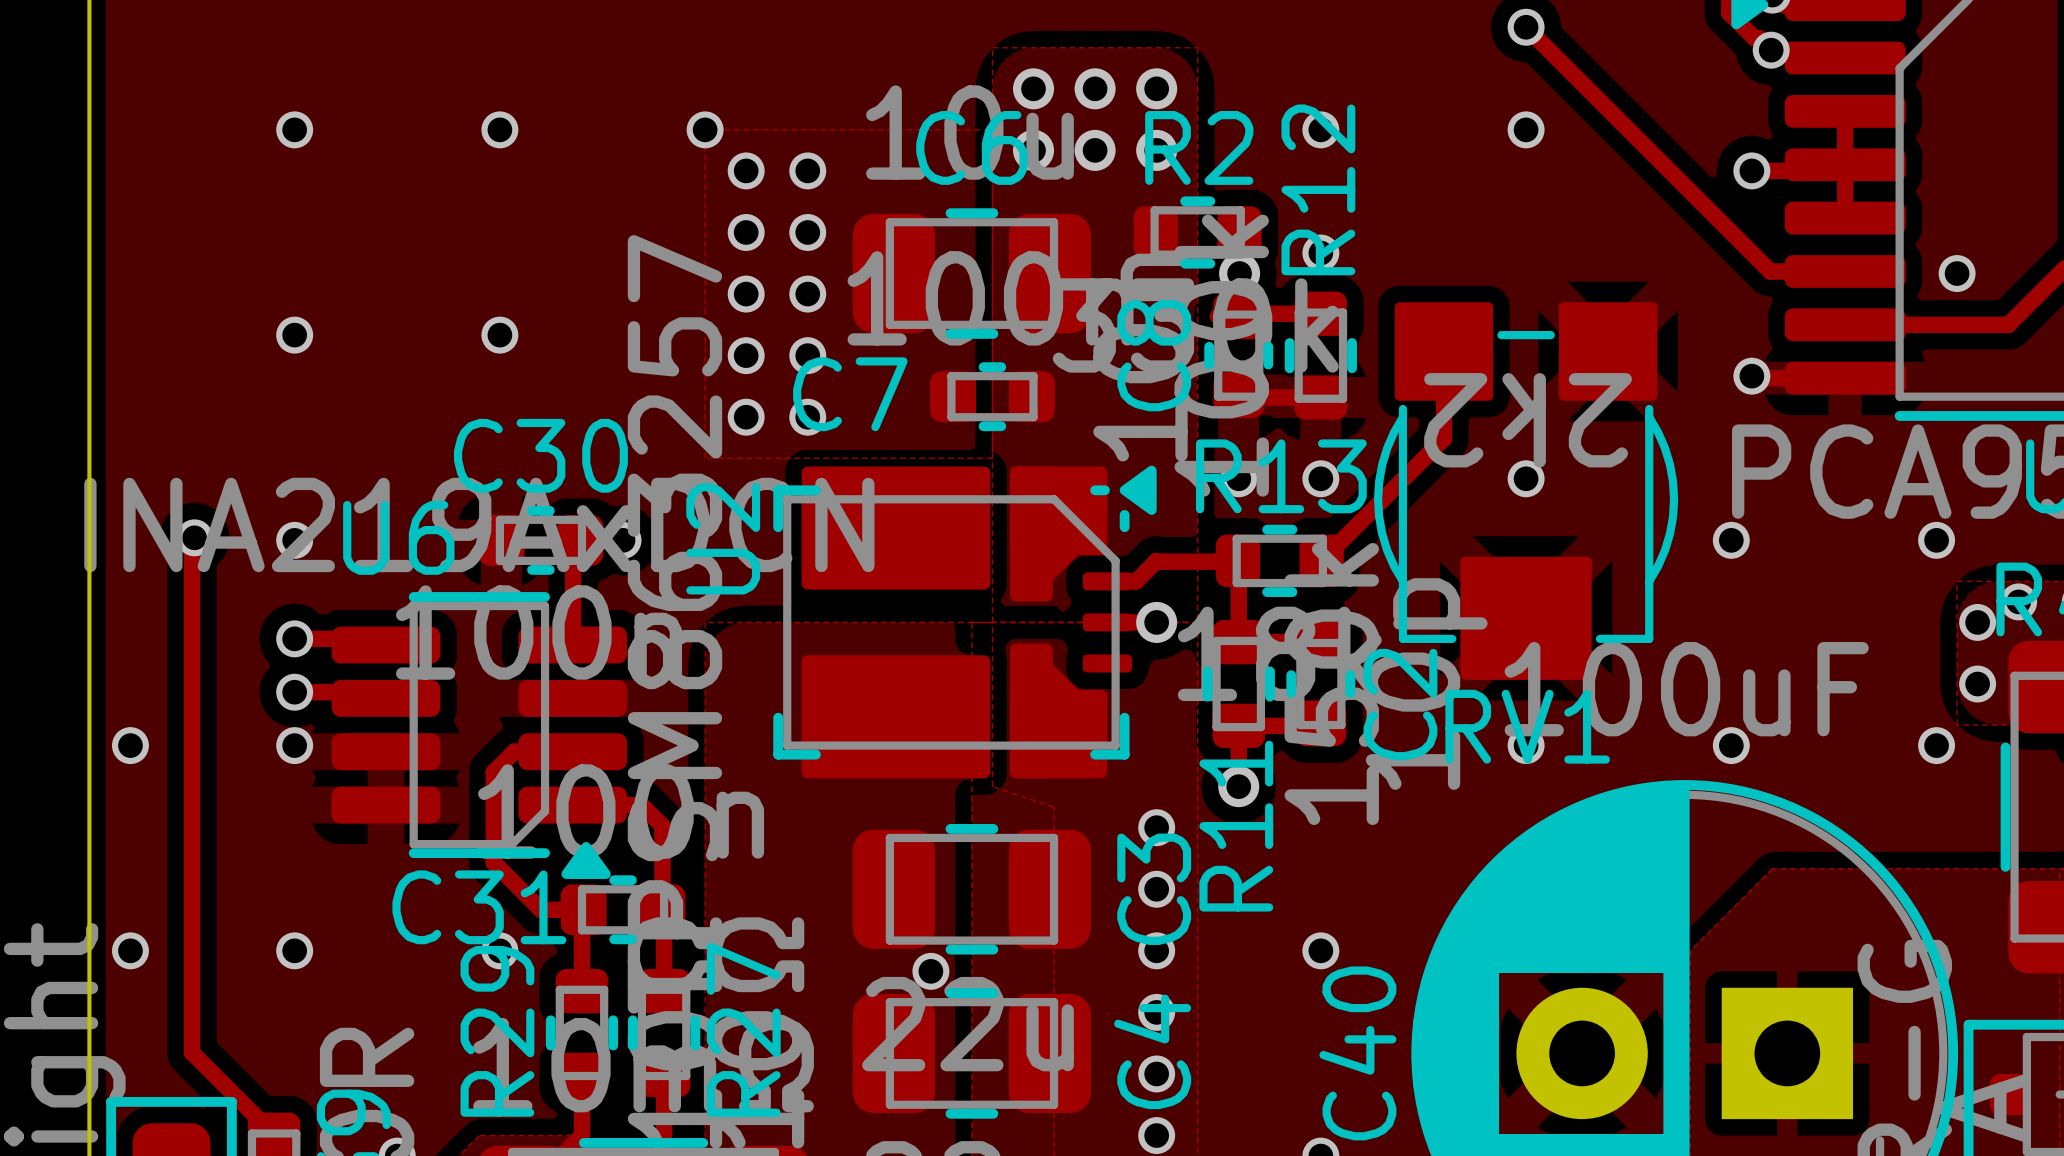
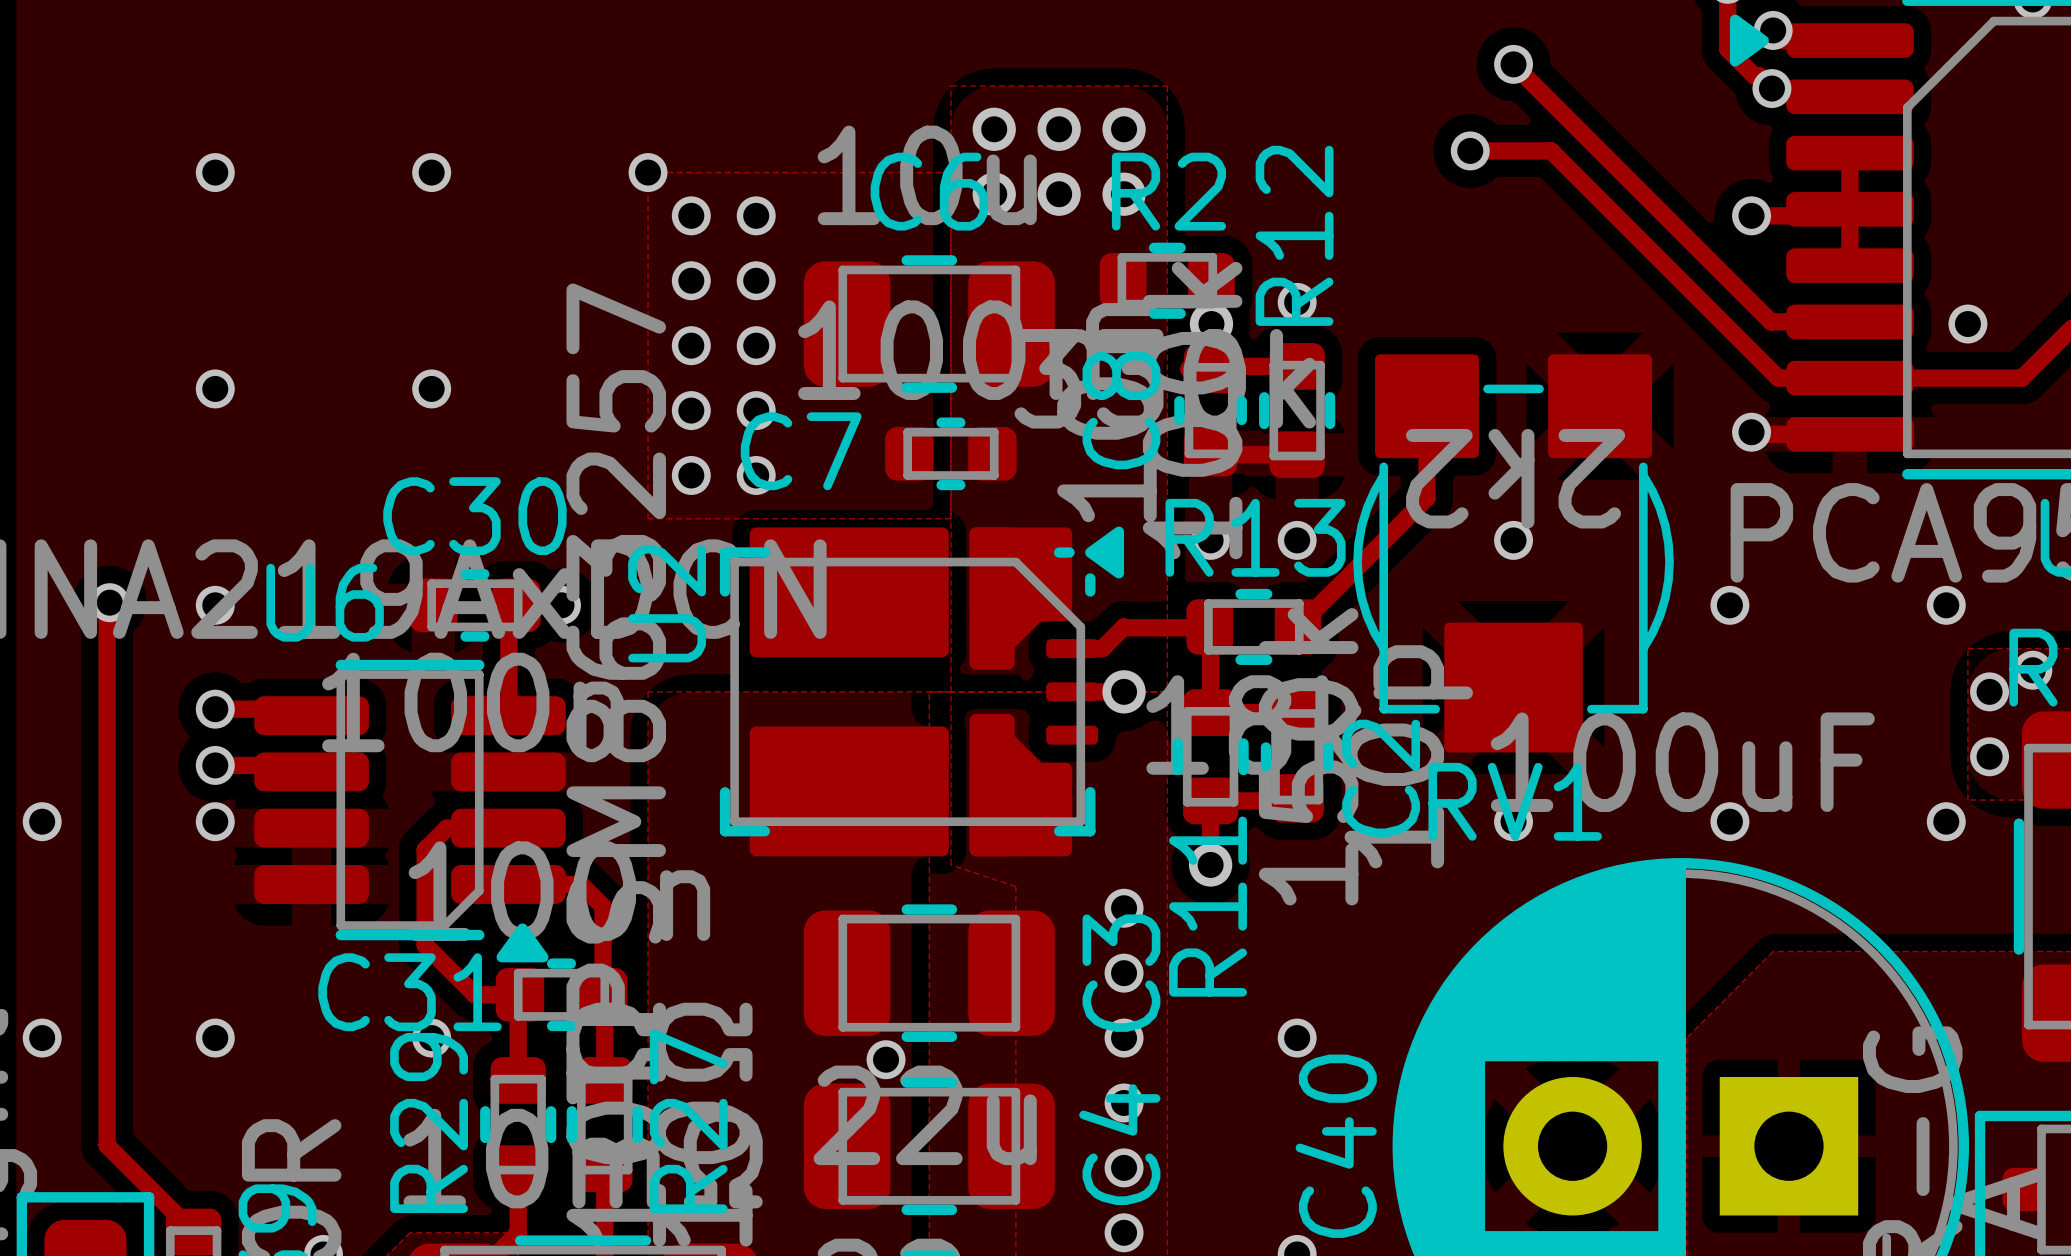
track: none -> (1470, 150) (1551, 150) (1778, 378) (1850, 378)
via: (1320, 129) -> none
via position: (1526, 129) -> (1470, 150)

